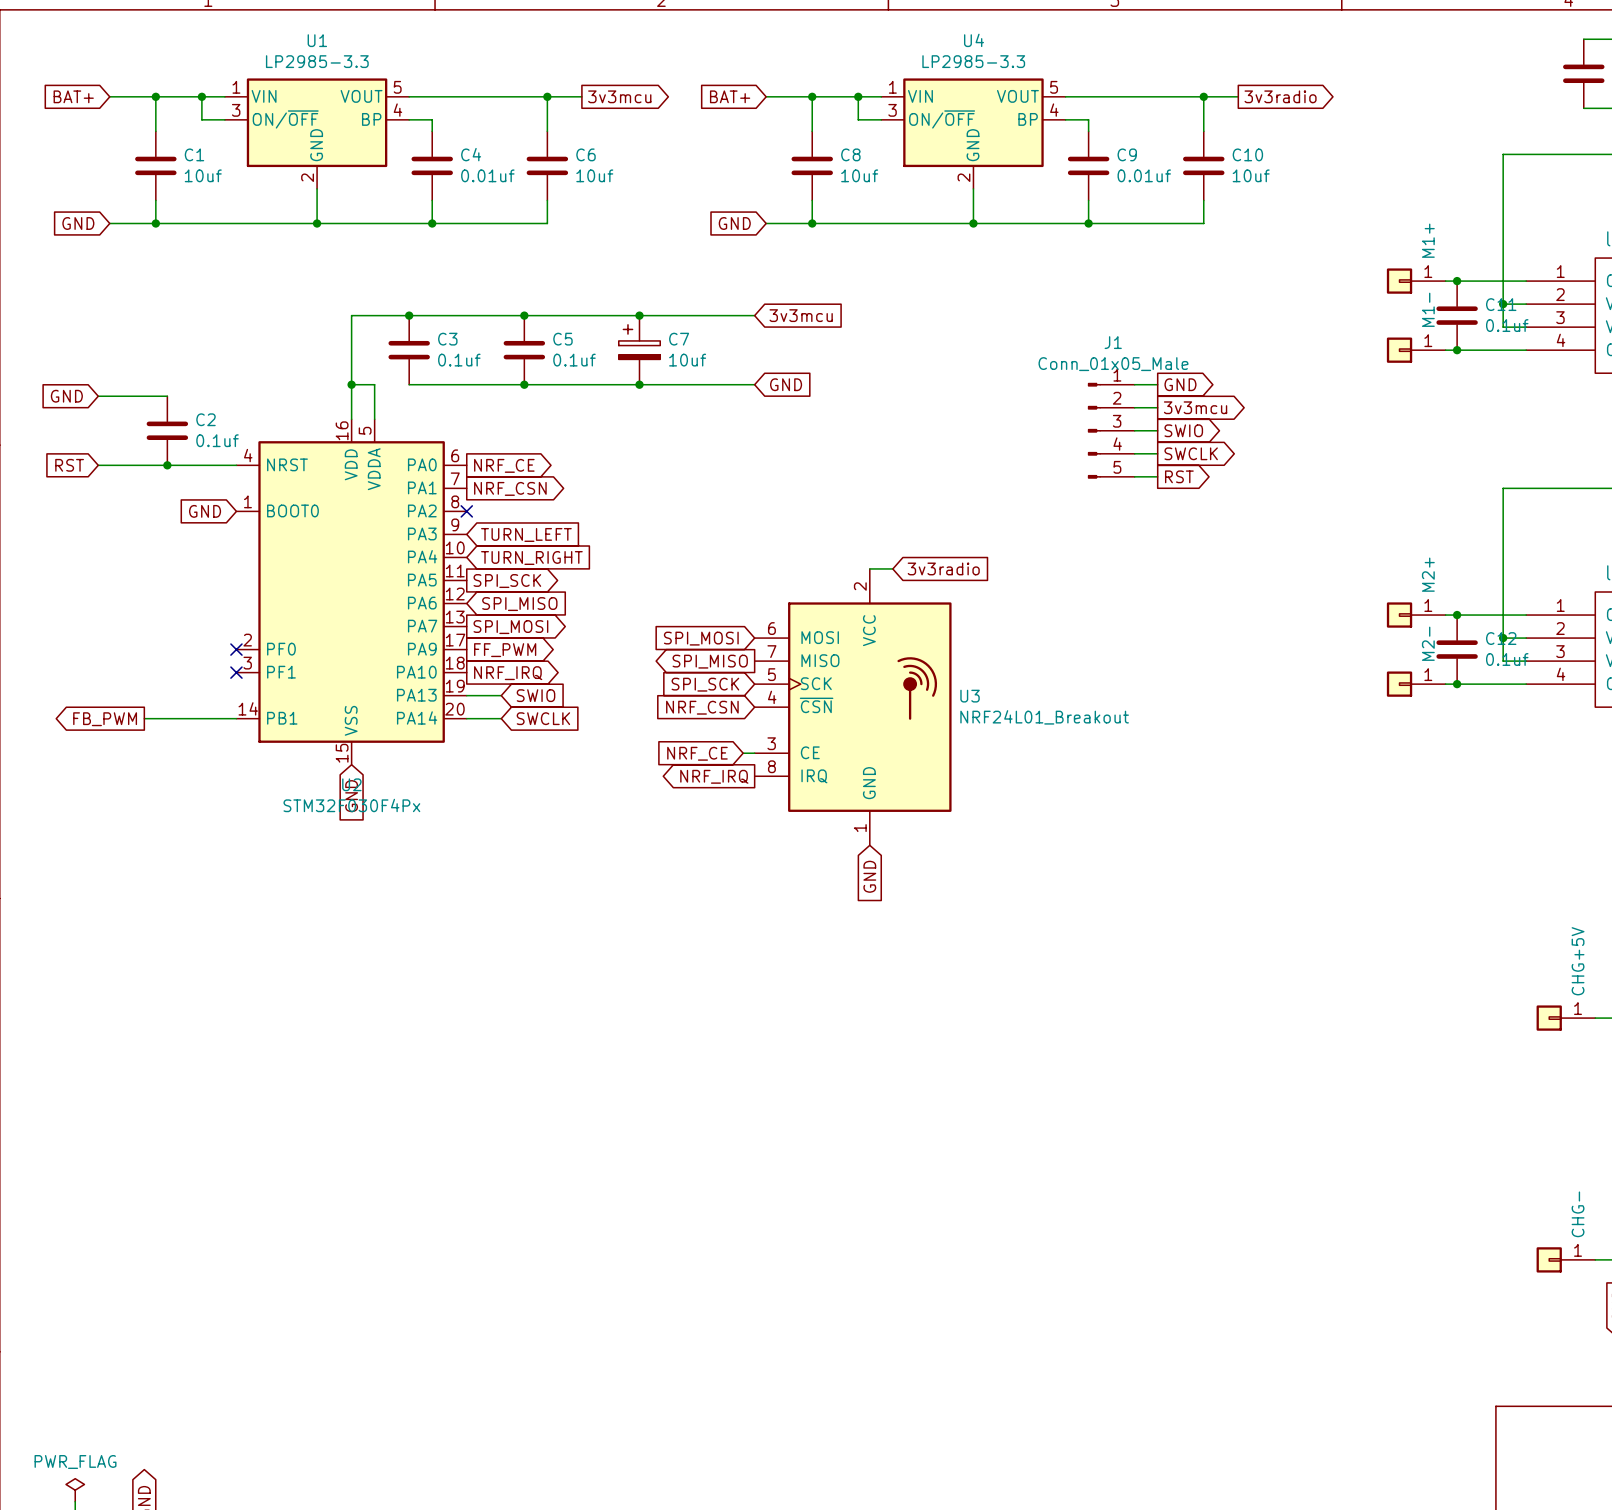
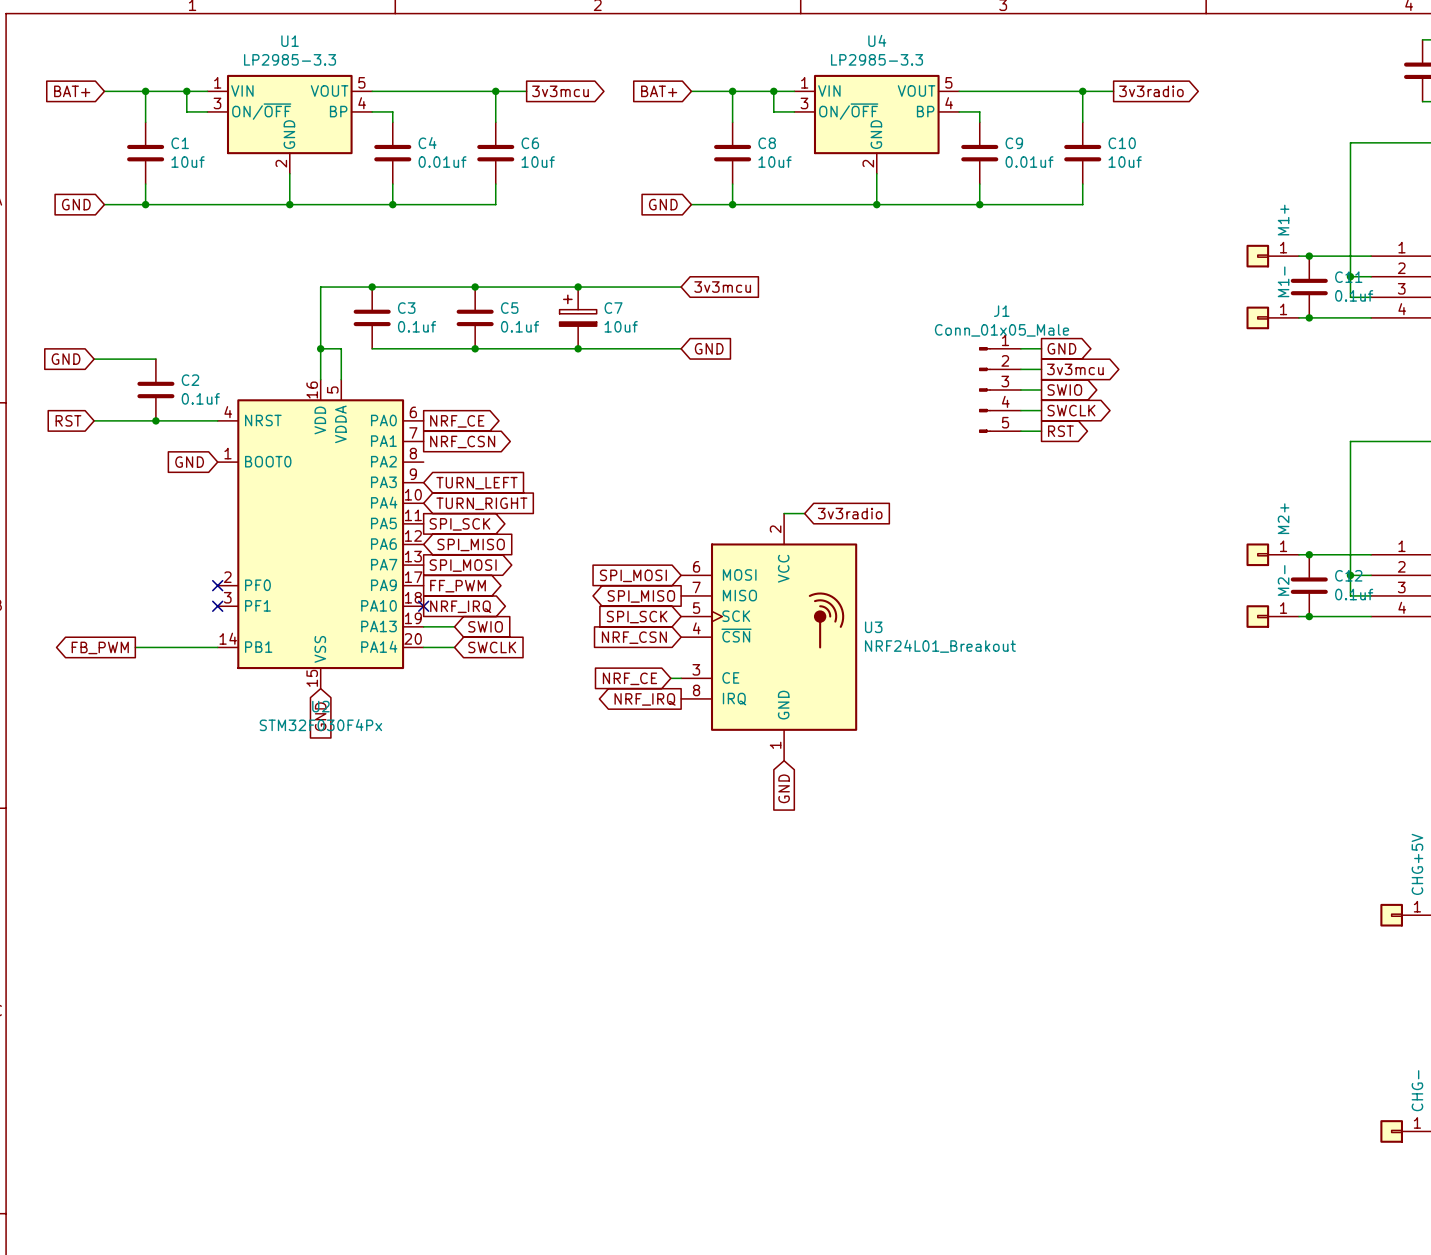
no-connect mark: (466, 511) -> none
no-connect mark: none -> (423, 606)

